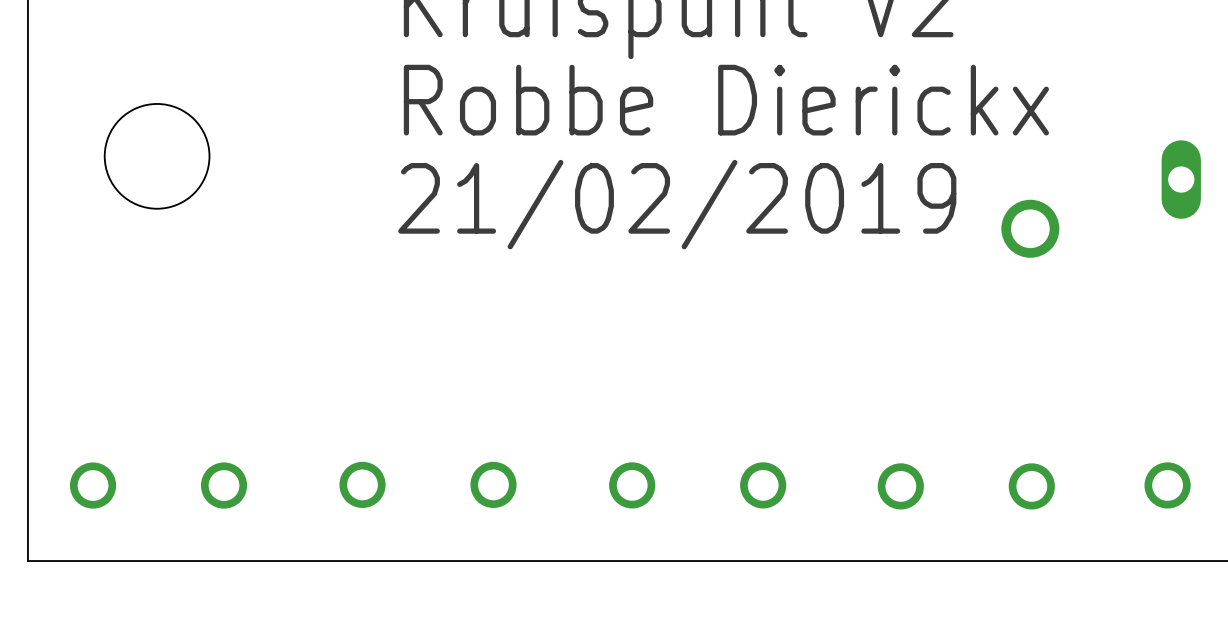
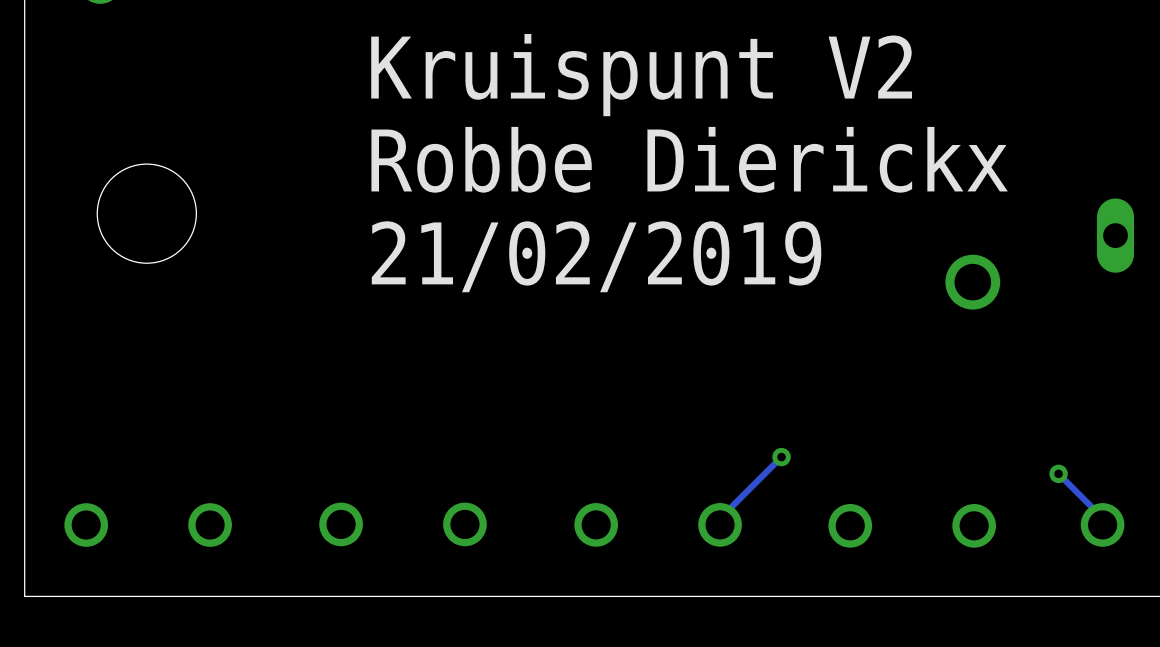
track: none -> (781, 457) (722, 515) (722, 524) (720, 524)
via: none -> (781, 457)
track: none -> (1058, 473) (1100, 515) (1100, 524) (1102, 524)
via: none -> (1058, 473)

